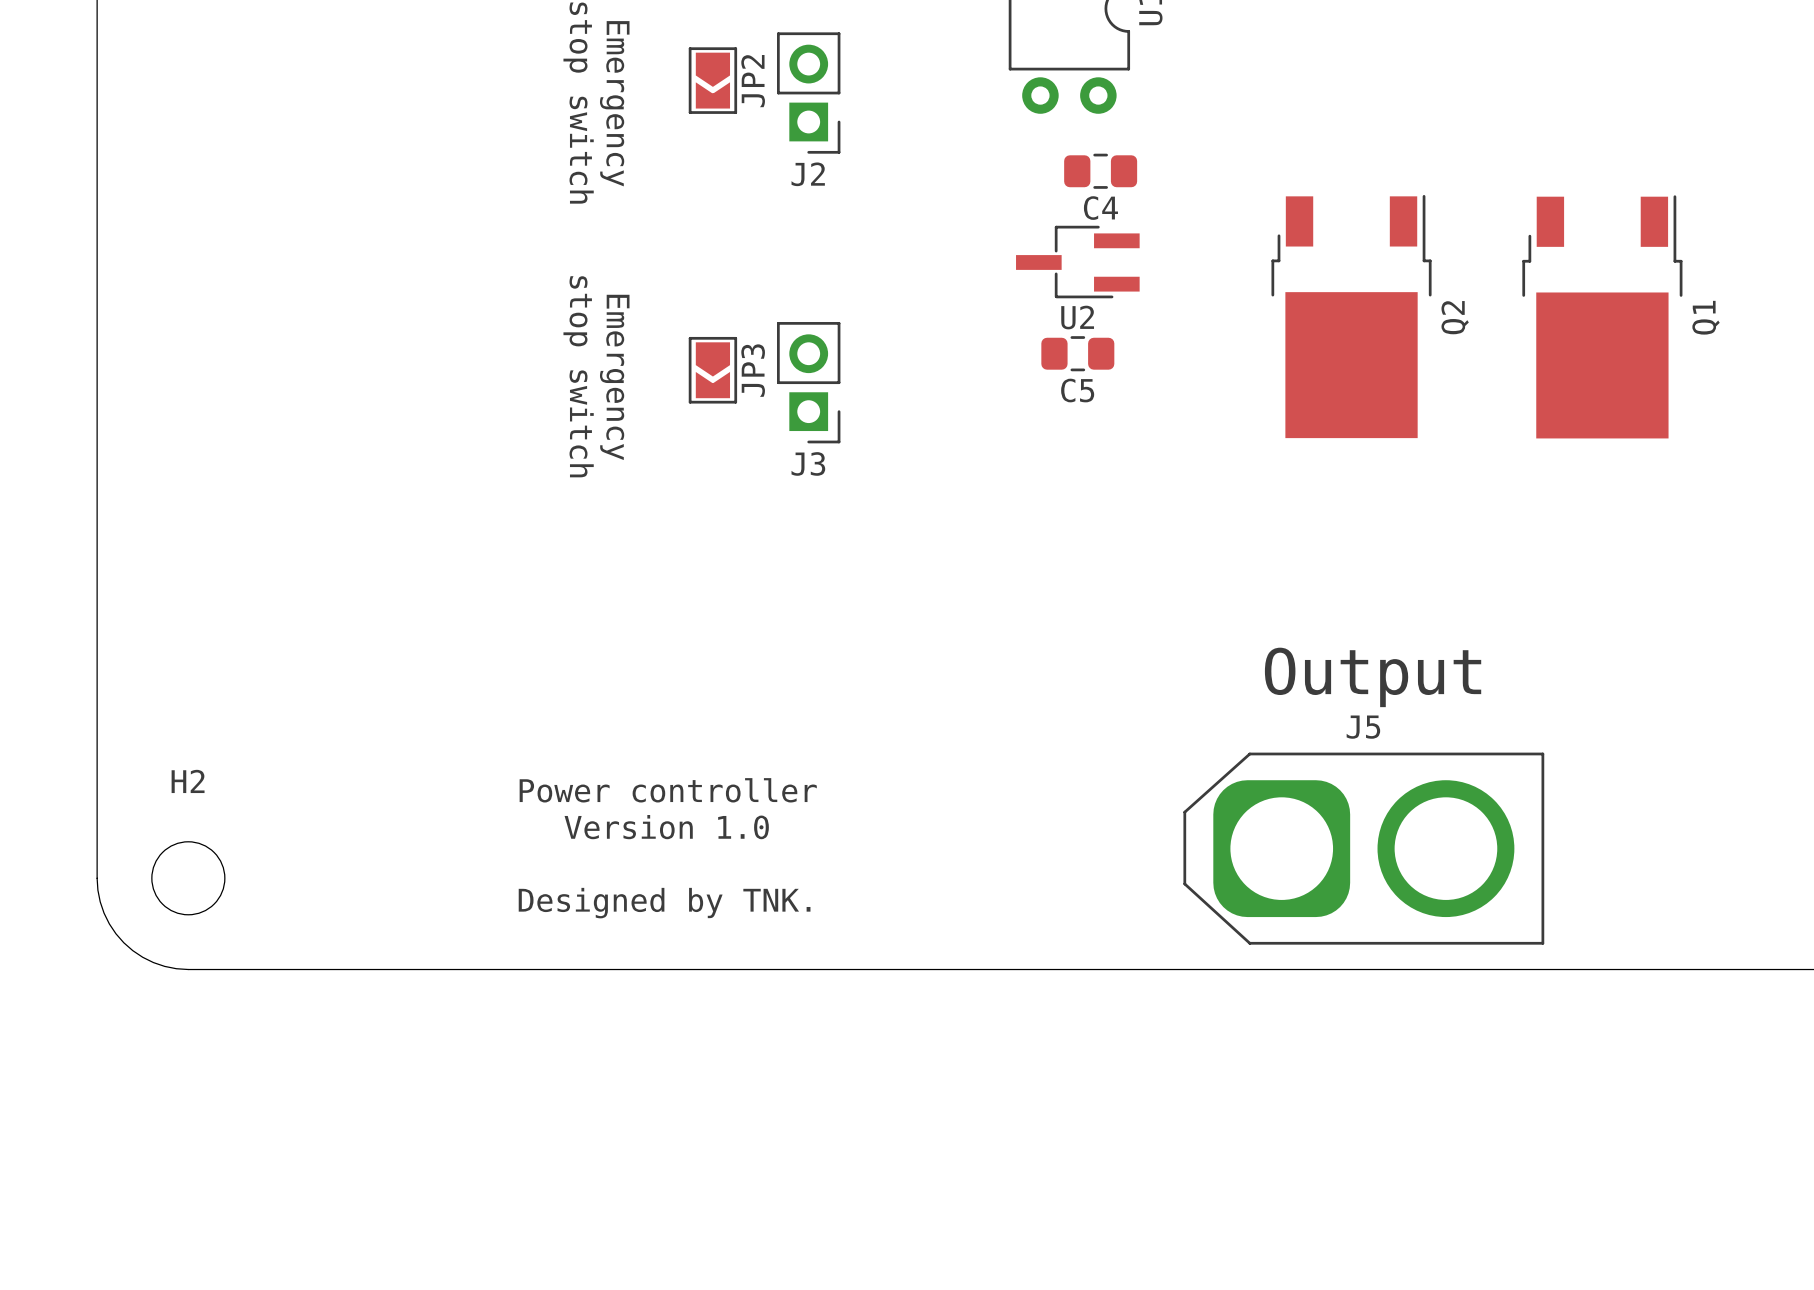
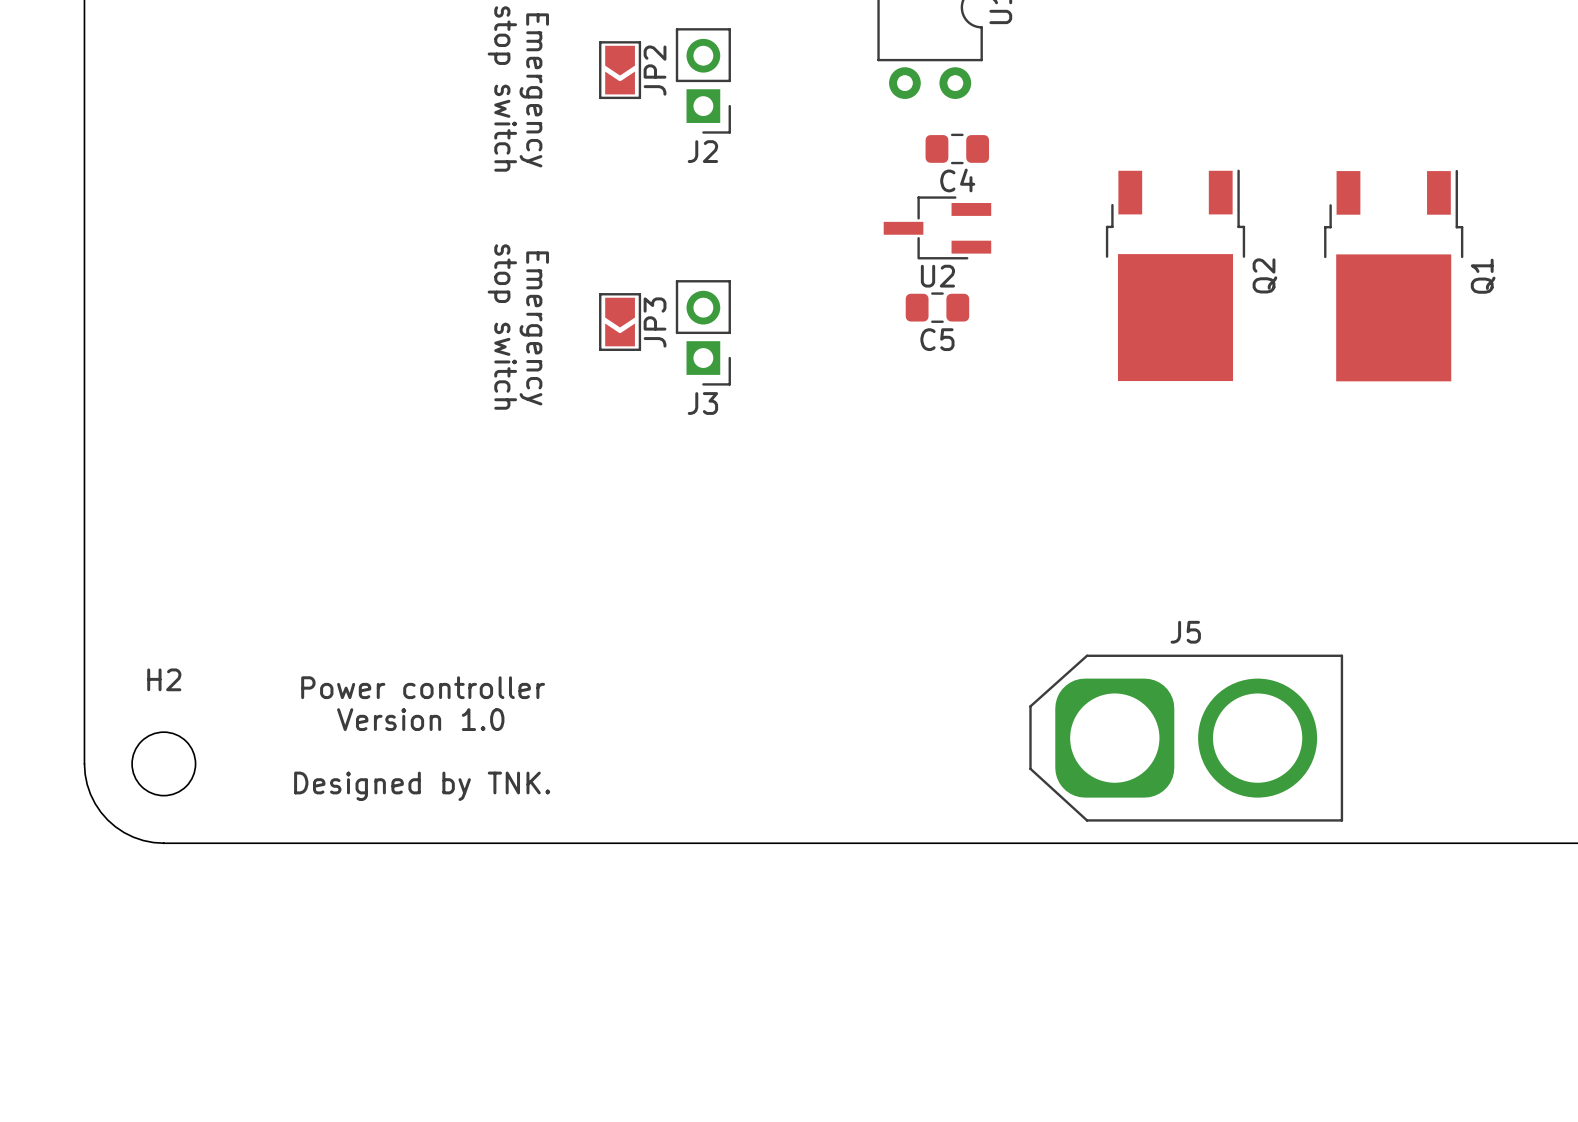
text: Output (1373, 677) -> none
text position: Power controller (668, 790) -> Power controller (423, 687)
text position: Version 1.0 (666, 827) -> Version 1.0 (420, 719)
text position: Designed by TNK. (664, 903) -> Designed by TNK. (422, 786)

